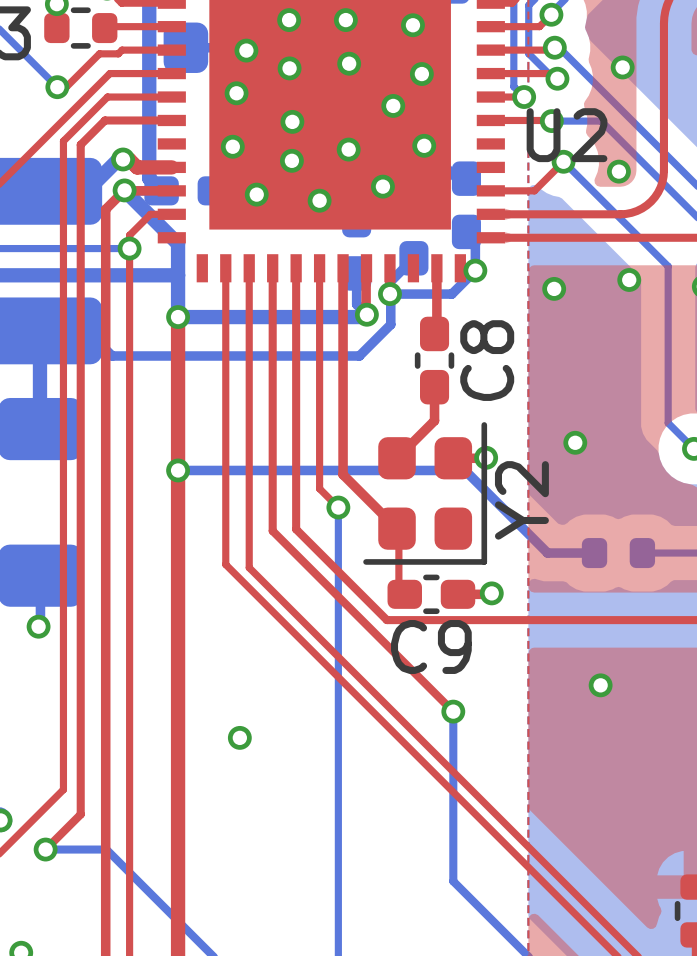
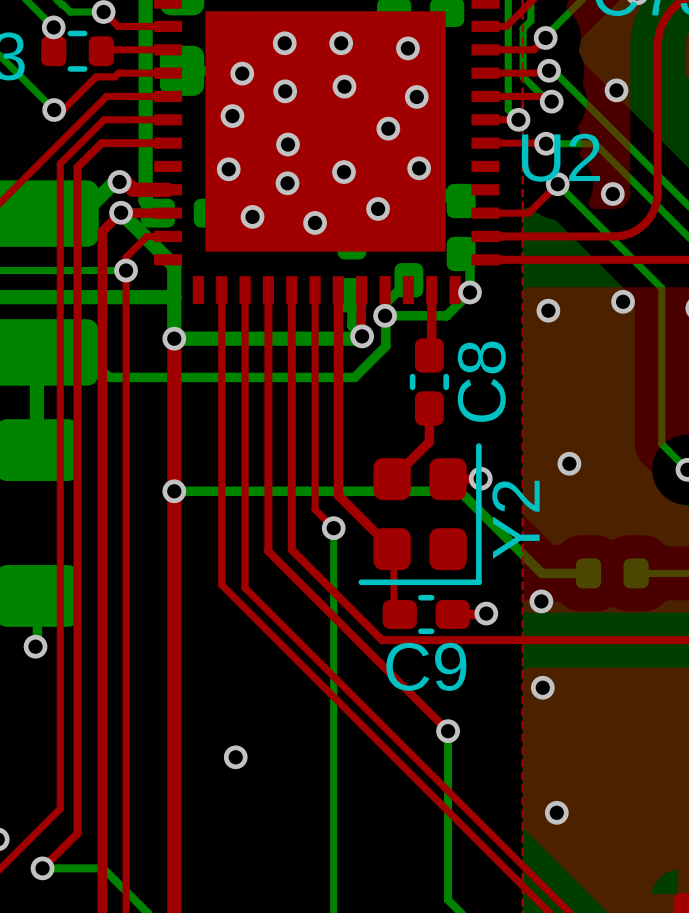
via: none -> (541, 601)
via position: (600, 685) -> (542, 687)
via: none -> (556, 812)

